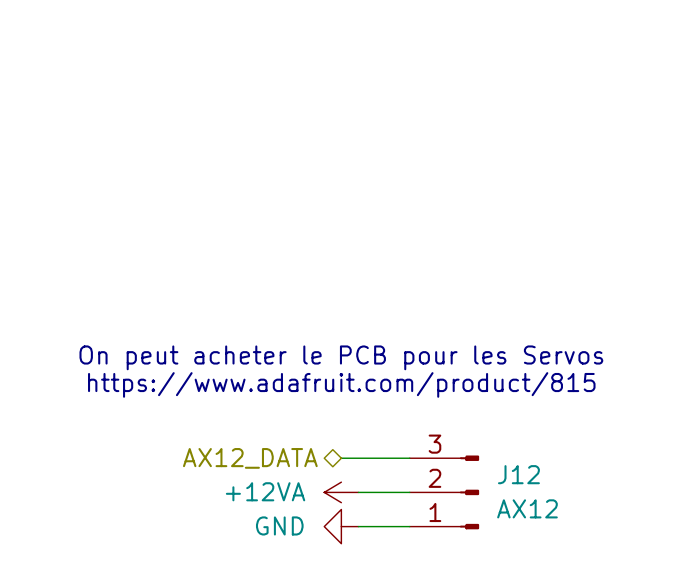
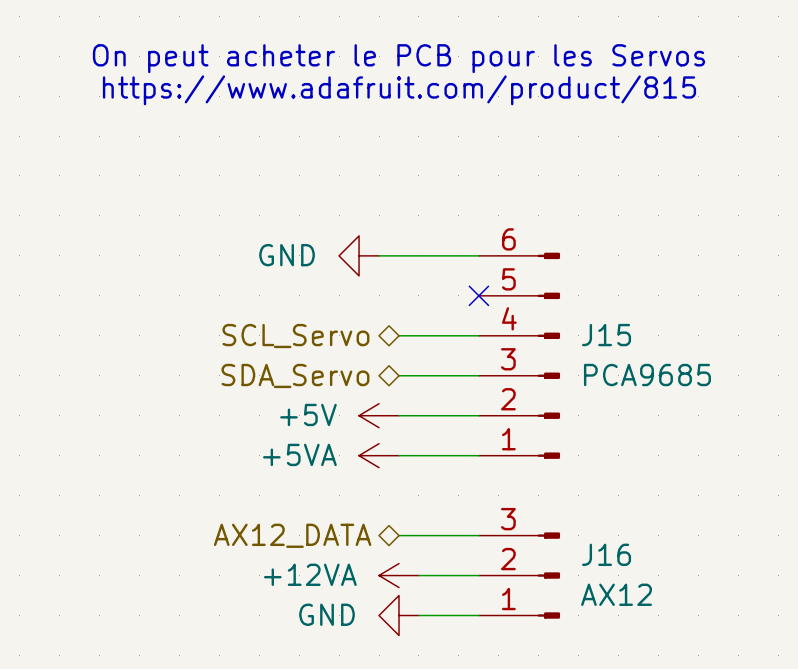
power symbol: none -> GND (359, 255)
wire: none -> (379, 255) (478, 255)
no-connect mark: none -> (478, 295)
hierarchical label: none -> SCL_Servo (295, 336)
wire: none -> (399, 335) (478, 335)
J15: none -> PCA9685 (519, 355)
hierarchical label: none -> SDA_Servo (295, 375)
wire: none -> (399, 375) (478, 375)
power symbol: none -> +5V (379, 415)
wire: none -> (399, 415) (478, 415)
text position: On peut acheter le PCB pour les Servos (341, 357) -> On peut acheter le PCB pour les Servos (399, 58)
text position: https://www.adafruit.com/product/815 (341, 384) -> https://www.adafruit.com/product/815 (399, 90)
power symbol: none -> +5VA (379, 455)
wire: none -> (399, 455) (478, 455)
J12 name: J12 (518, 474) -> J16 (606, 554)

